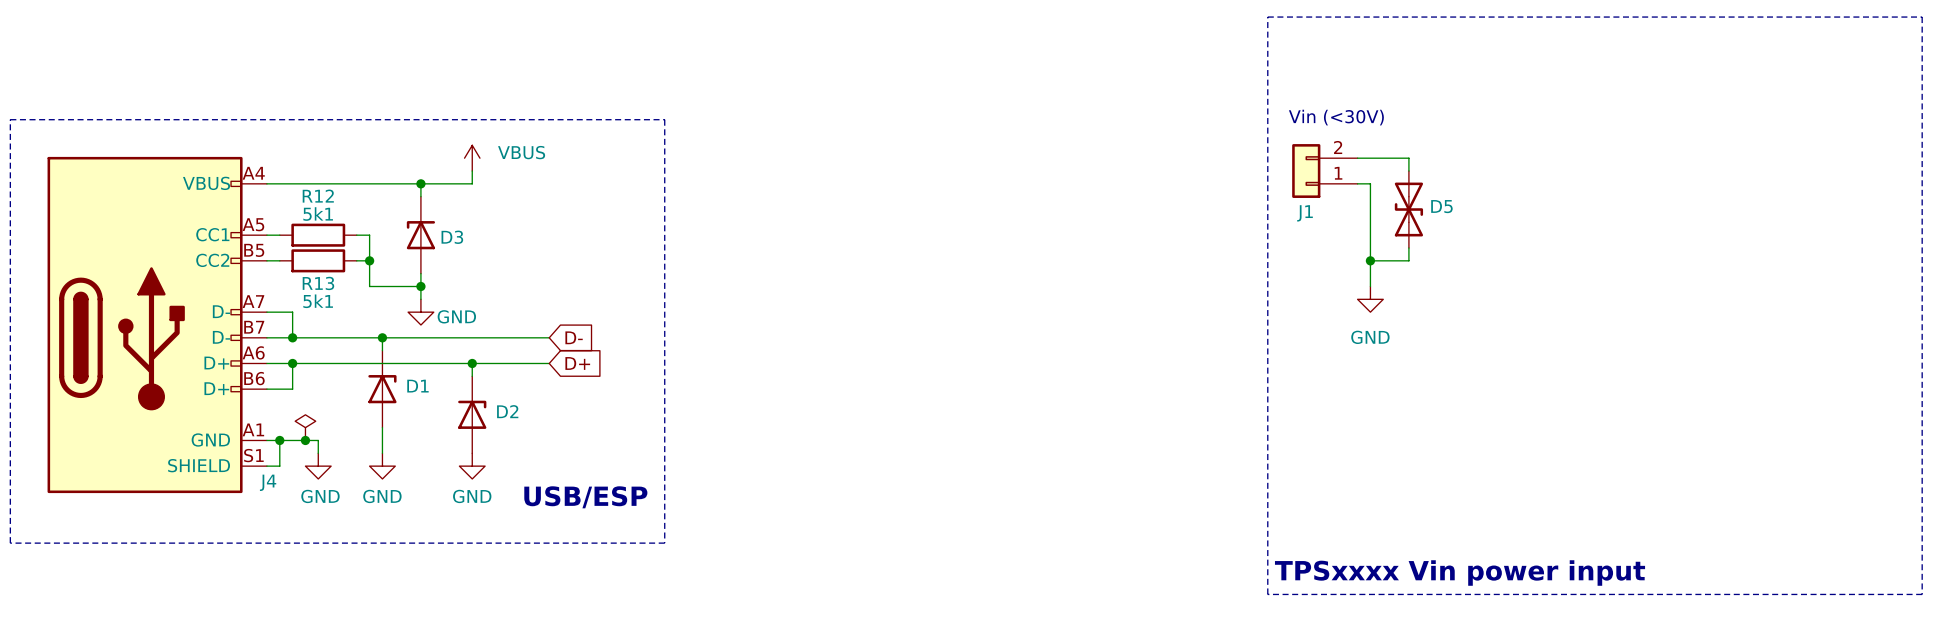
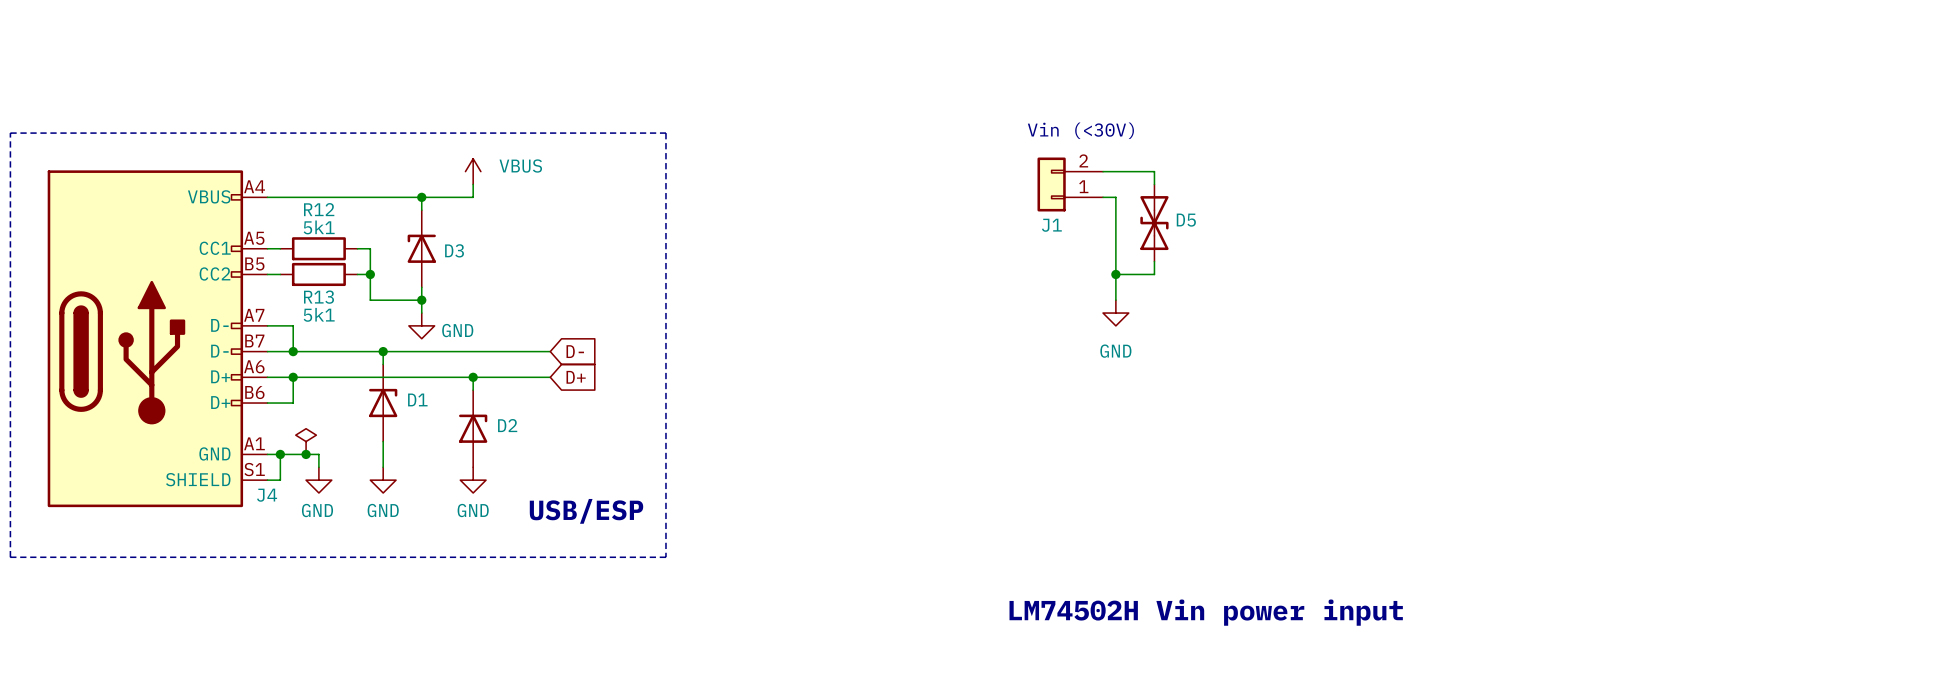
line: (1267, 17) (1922, 17) (1922, 594) (1267, 594) (1267, 17) -> none
text: none -> Vin (<30V) (1080, 130)
text: Vin (<30V) (1336, 117) -> none
wire: none -> (1103, 171) (1154, 171) (1154, 184)
wire: (1357, 158) (1408, 158) (1408, 171) -> none
J1 position: (1324, 171) -> (1070, 184)
wire: none -> (1103, 197) (1115, 197) (1115, 300)
wire: (1357, 183) (1370, 183) (1370, 286) -> none
D5 position: (1408, 209) -> (1154, 223)
wire: none -> (1154, 261) (1154, 274) (1115, 274)
wire: (1408, 248) (1408, 260) (1370, 260) -> none
junction: none -> (1115, 274)
junction: (1370, 260) -> none
power symbol: none -> GND (1115, 313)
power symbol: GND (1370, 299) -> none
text: TPSxxxx Vin power input (1460, 573) -> none
text: none -> LM74502H Vin power input (1206, 612)

